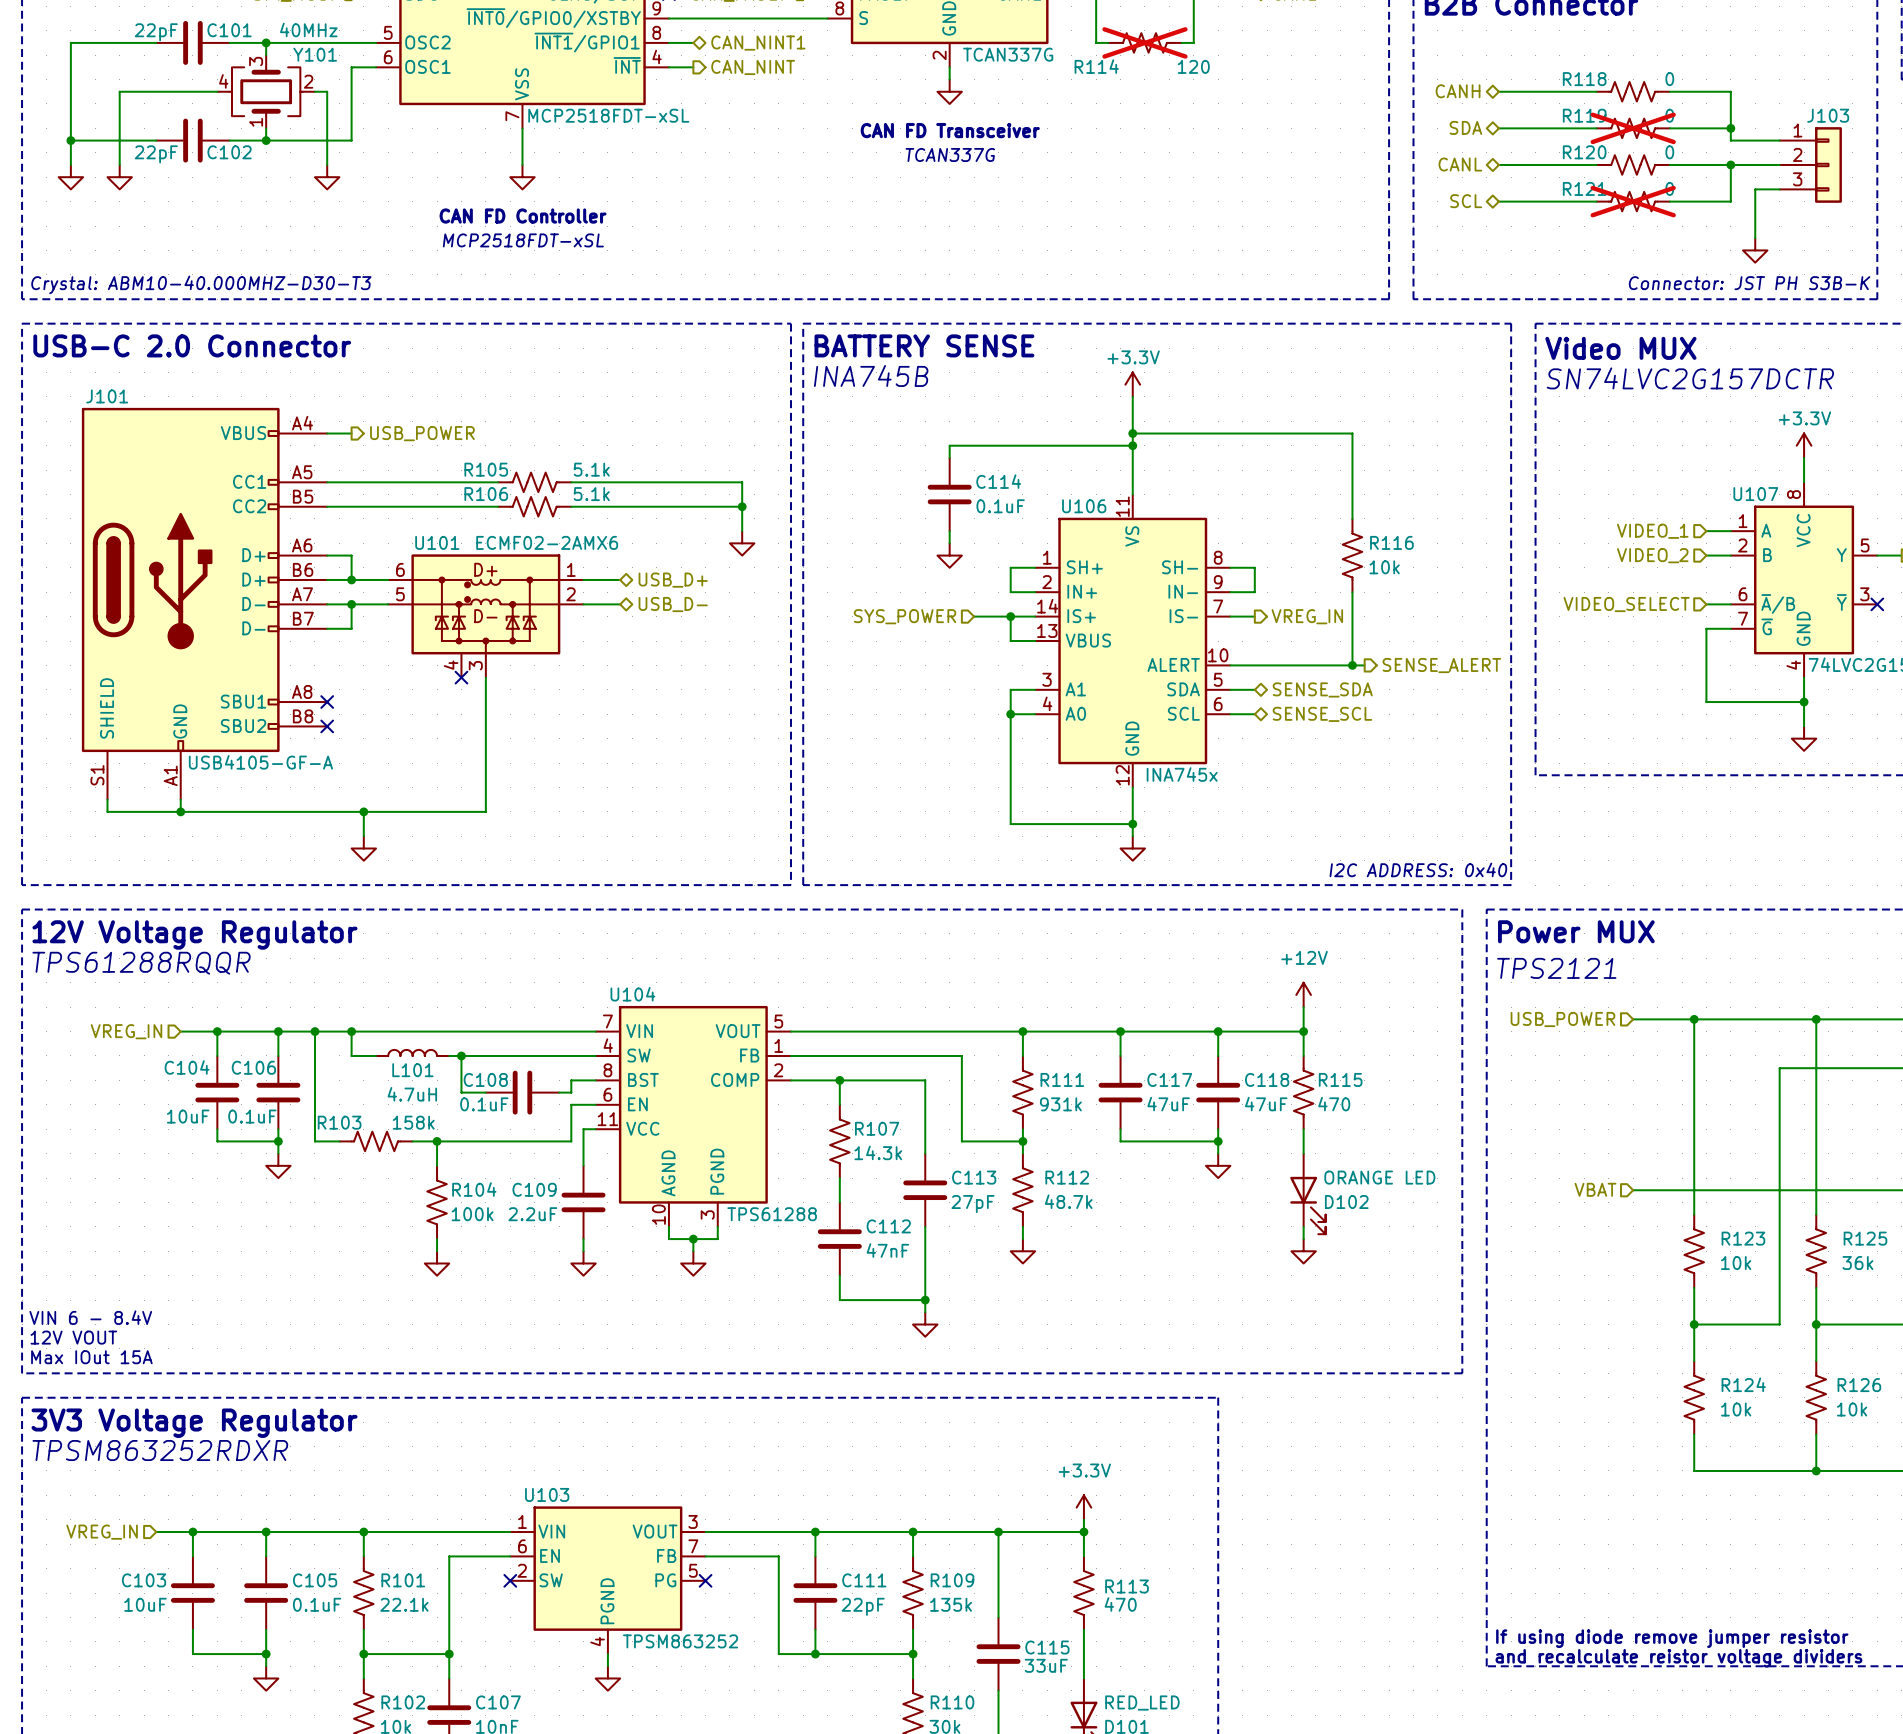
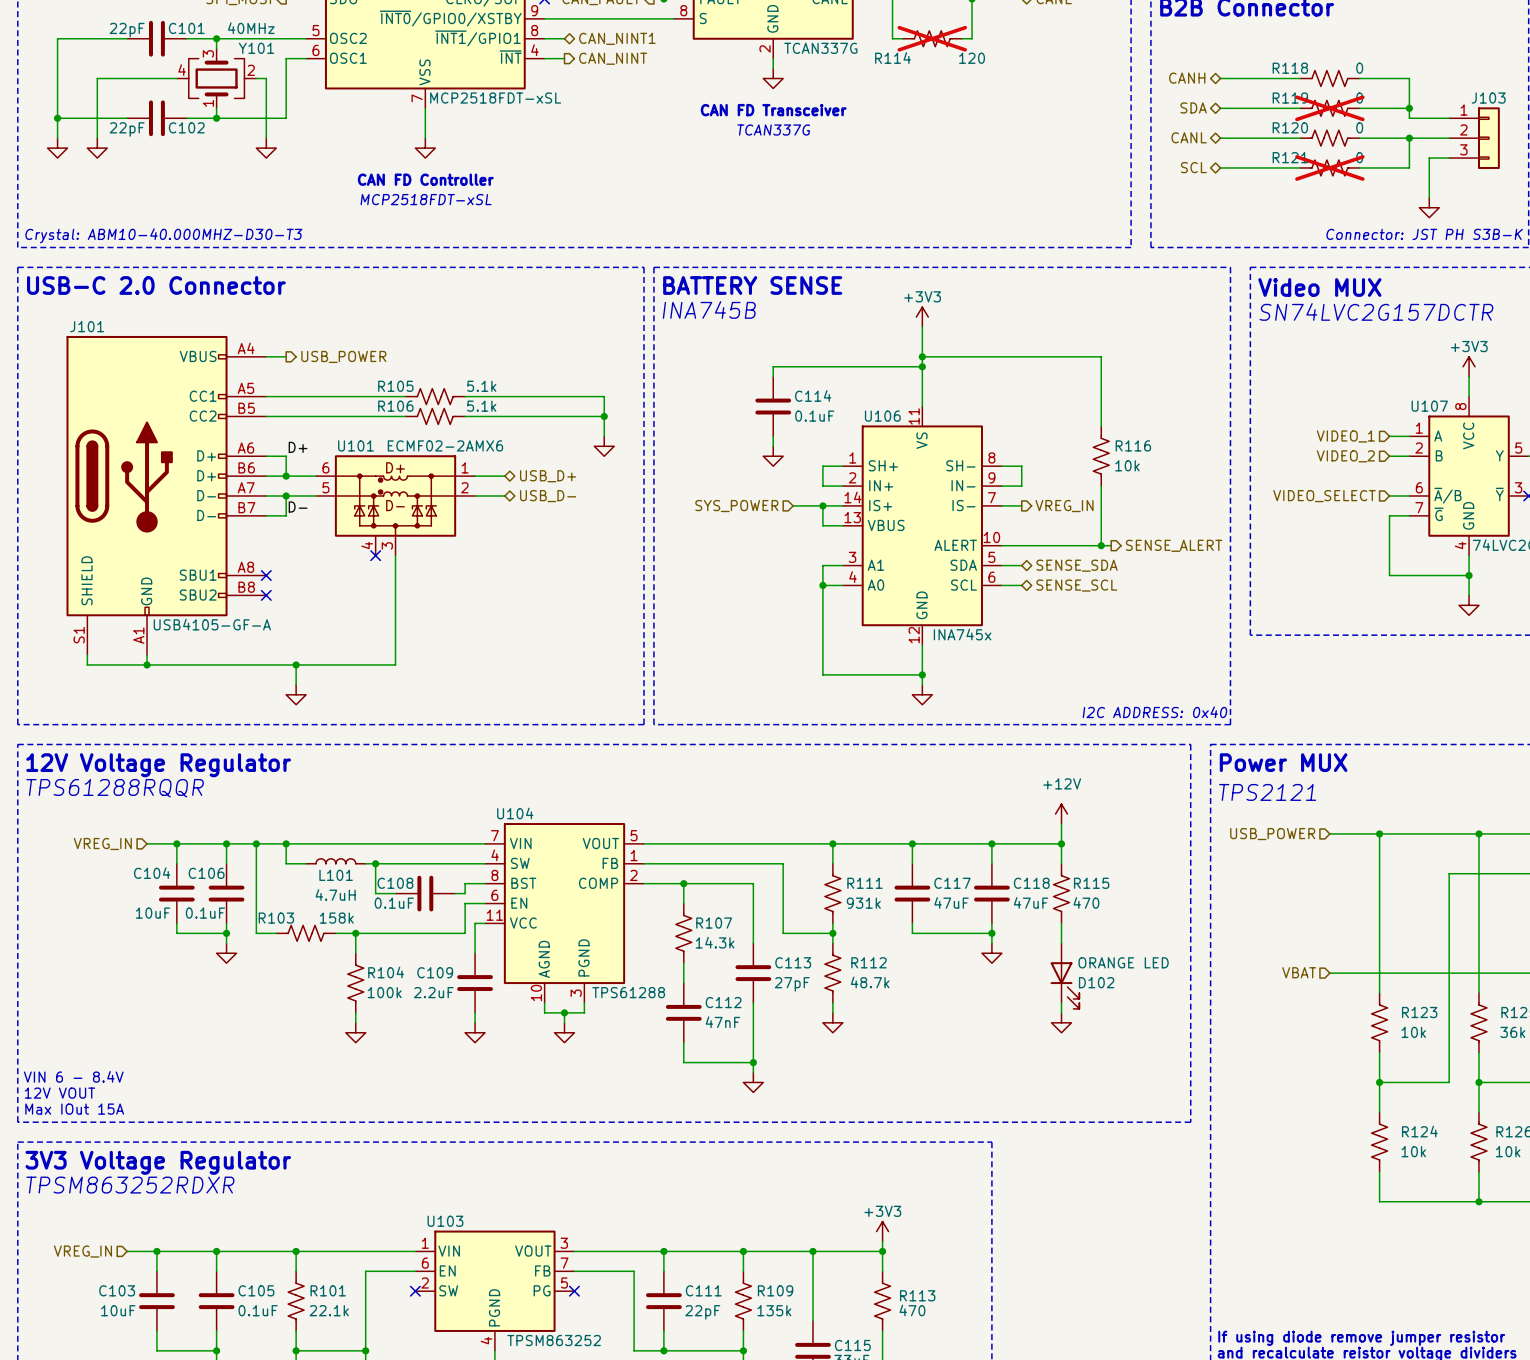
power symbol: +3.3V (1132, 384) -> +3V3 (922, 317)
power symbol: +3.3V (1804, 445) -> +3V3 (1469, 366)
label: none -> D+ (298, 447)
label: none -> D- (298, 507)
power symbol: +3.3V (1083, 1507) -> +3V3 (882, 1231)

